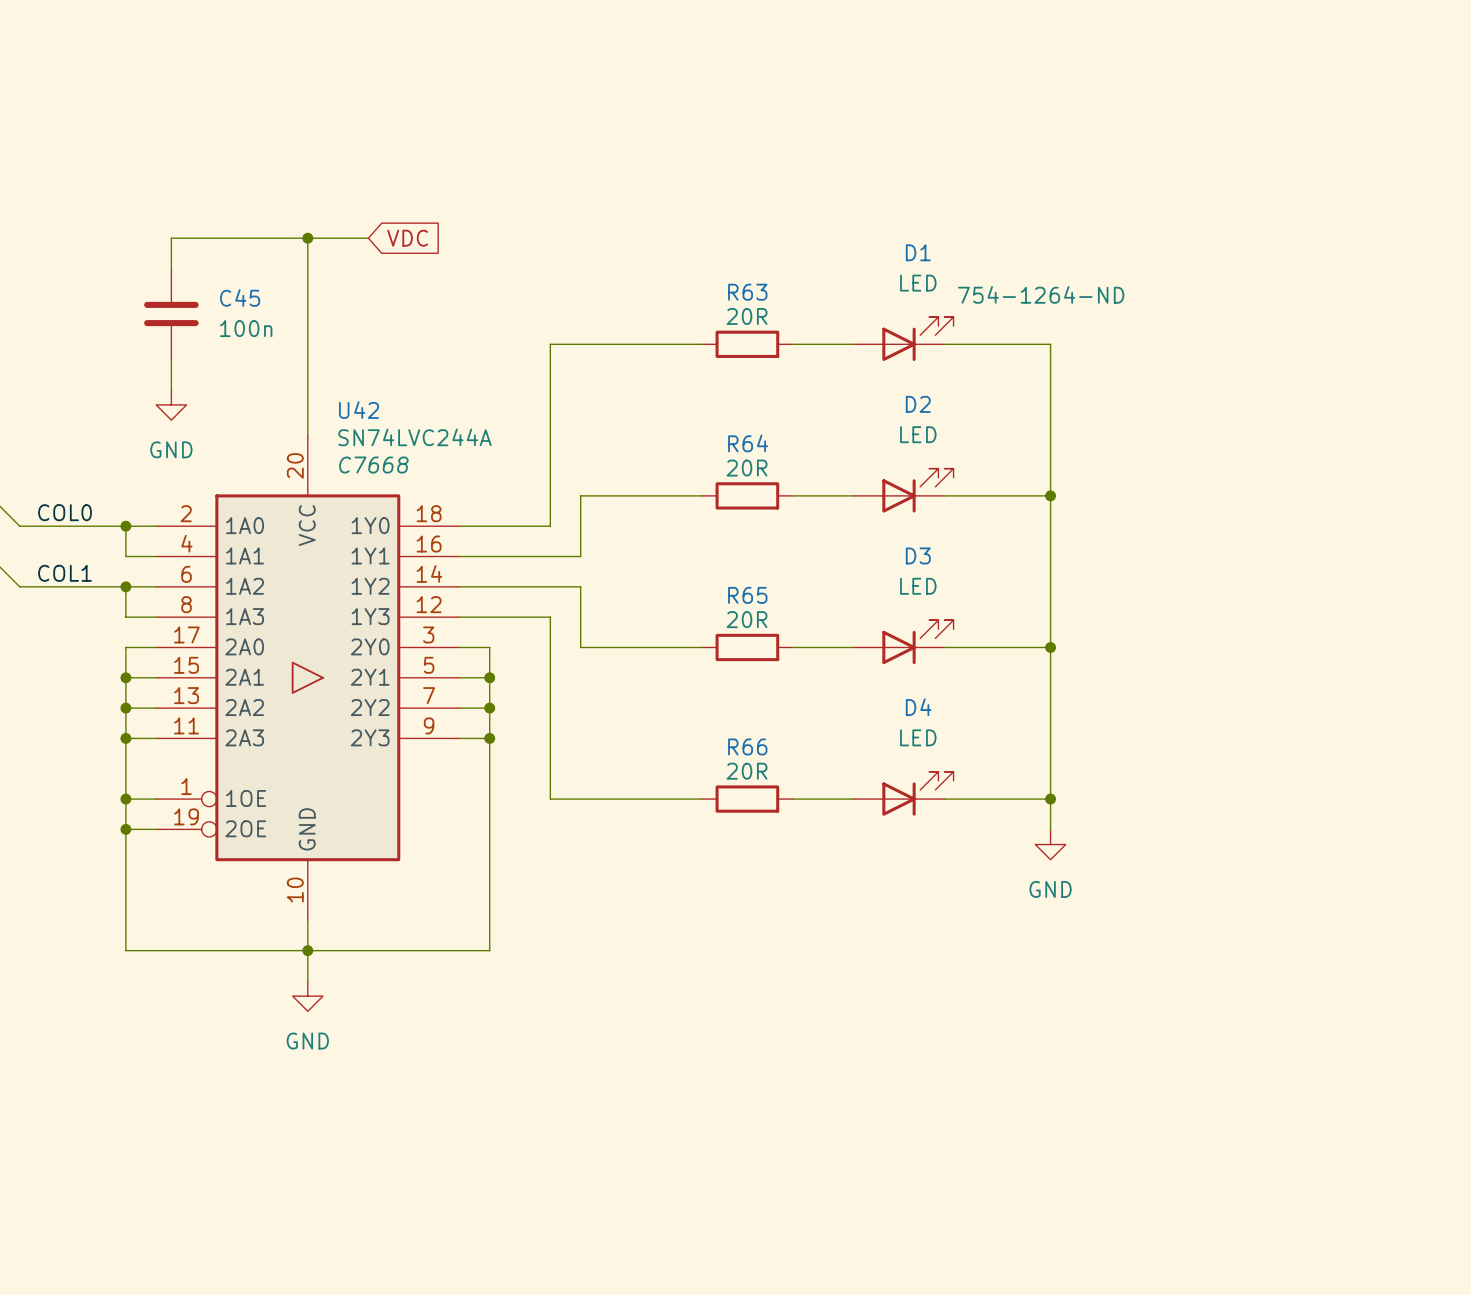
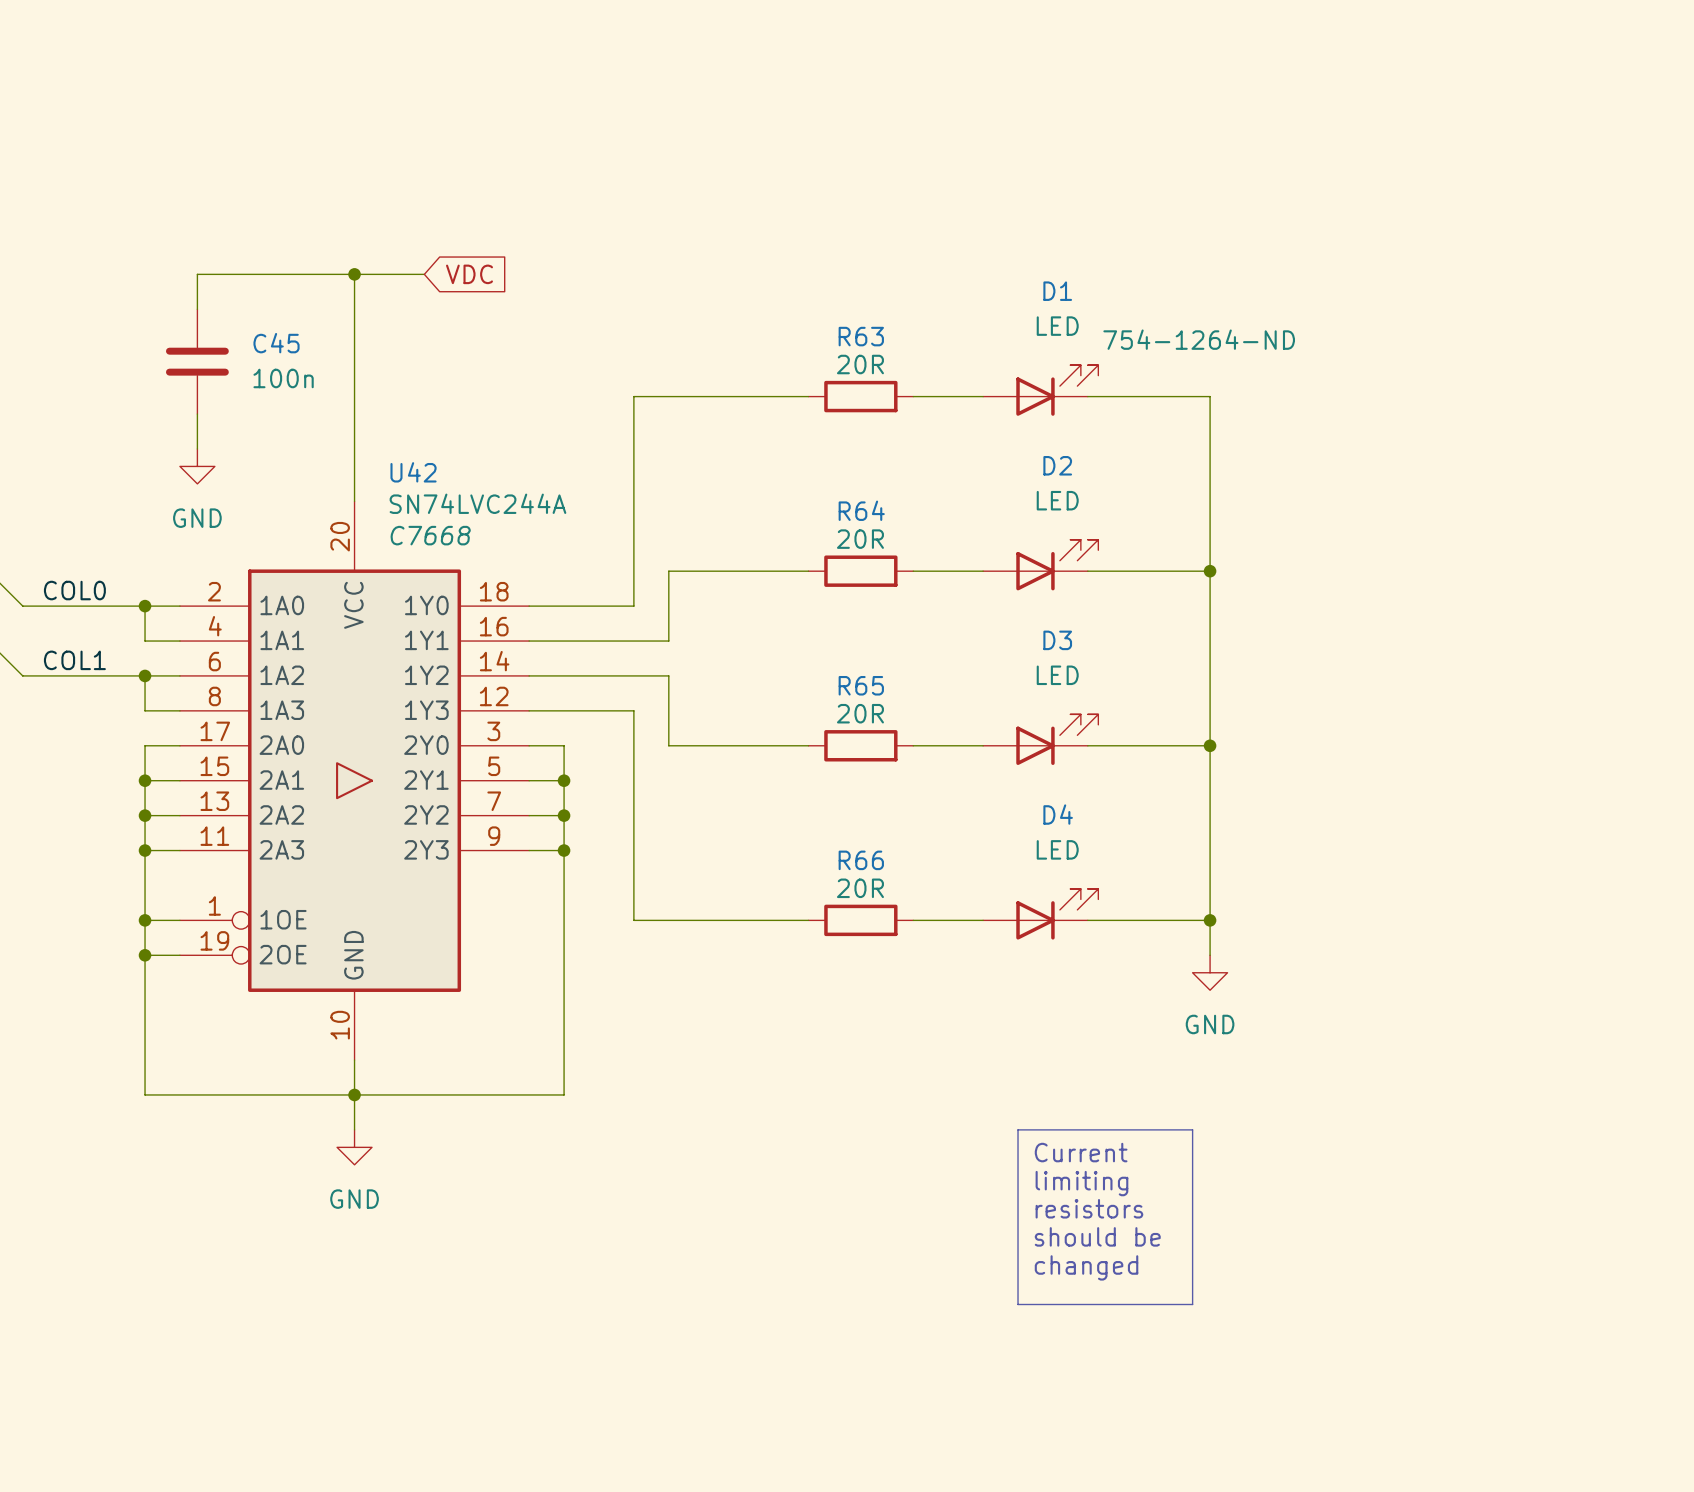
line: none -> (1018, 1129) (1192, 1129) (1192, 1304) (1018, 1304) (1018, 1129)
text: none -> Current (1081, 1152)
text: none -> limiting (1081, 1183)
text: none -> resistors (1089, 1208)
text: none -> should be (1097, 1236)
text: none -> changed (1086, 1267)

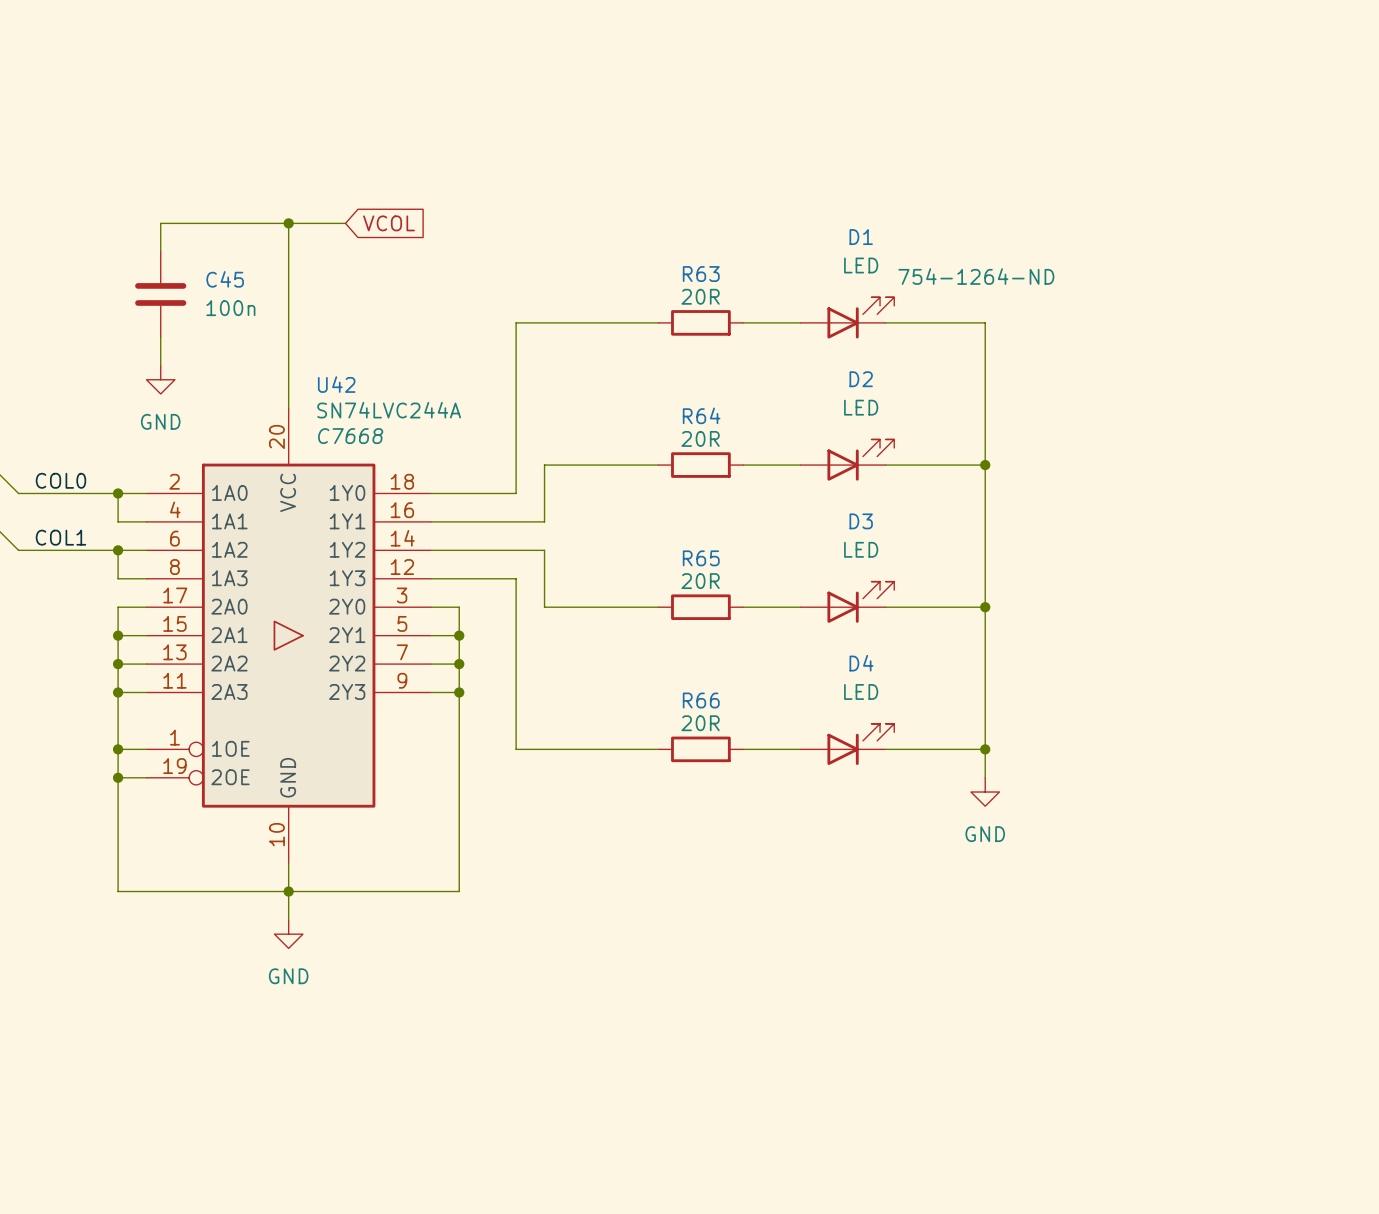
global label: VDC (469, 274) -> VCOL (389, 223)
line: (1018, 1129) (1192, 1129) (1192, 1304) (1018, 1304) (1018, 1129) -> none
text: Current (1081, 1152) -> none
text: limiting (1081, 1183) -> none
text: resistors (1089, 1208) -> none
text: should be (1097, 1236) -> none
text: changed (1086, 1267) -> none

